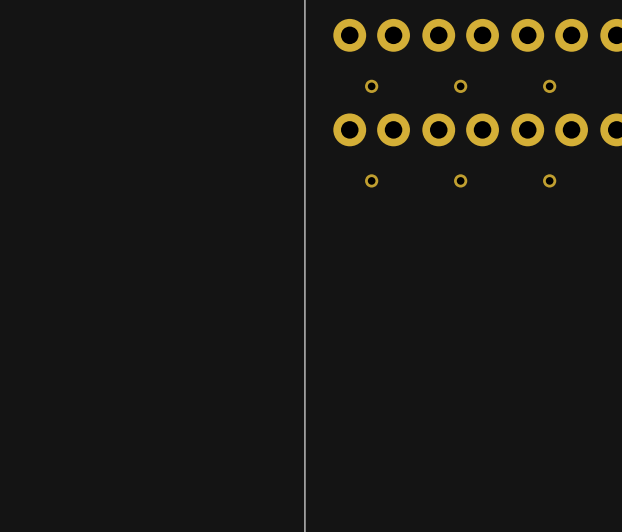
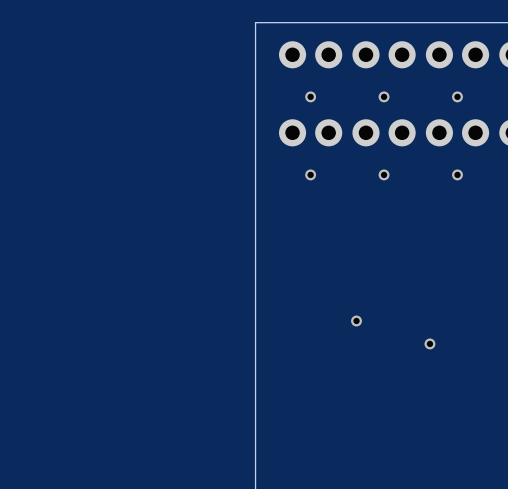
via: none -> (356, 320)
via: none -> (429, 343)

